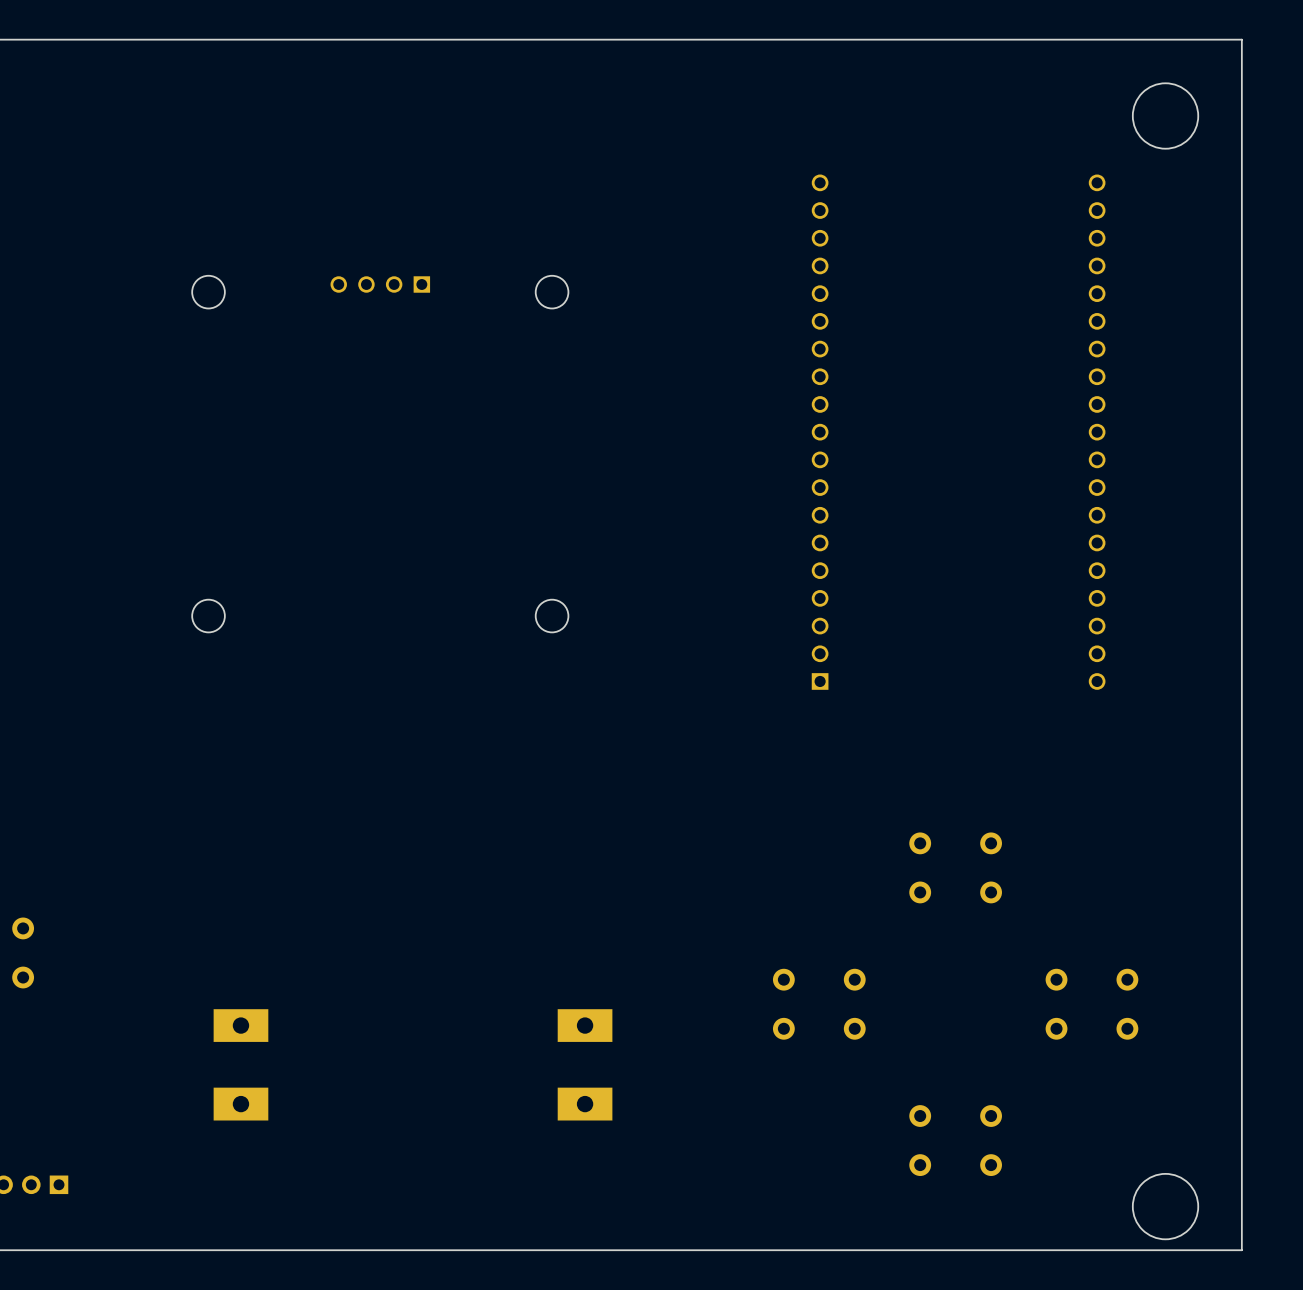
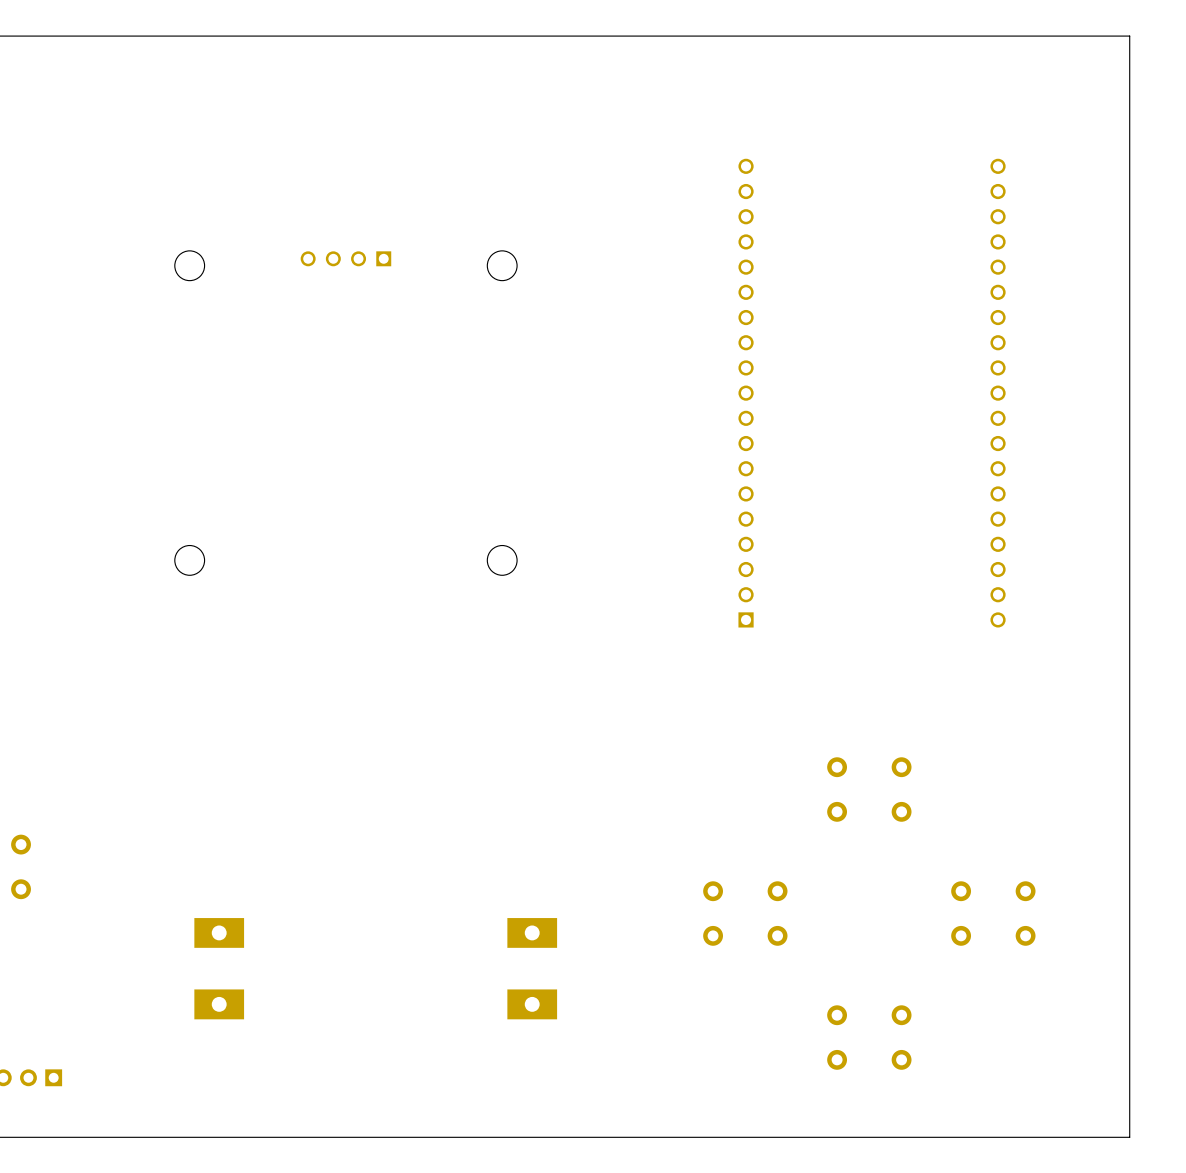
round board edge: [1132, 83, 1199, 149] -> none
round board edge: [1132, 1173, 1199, 1240] -> none

